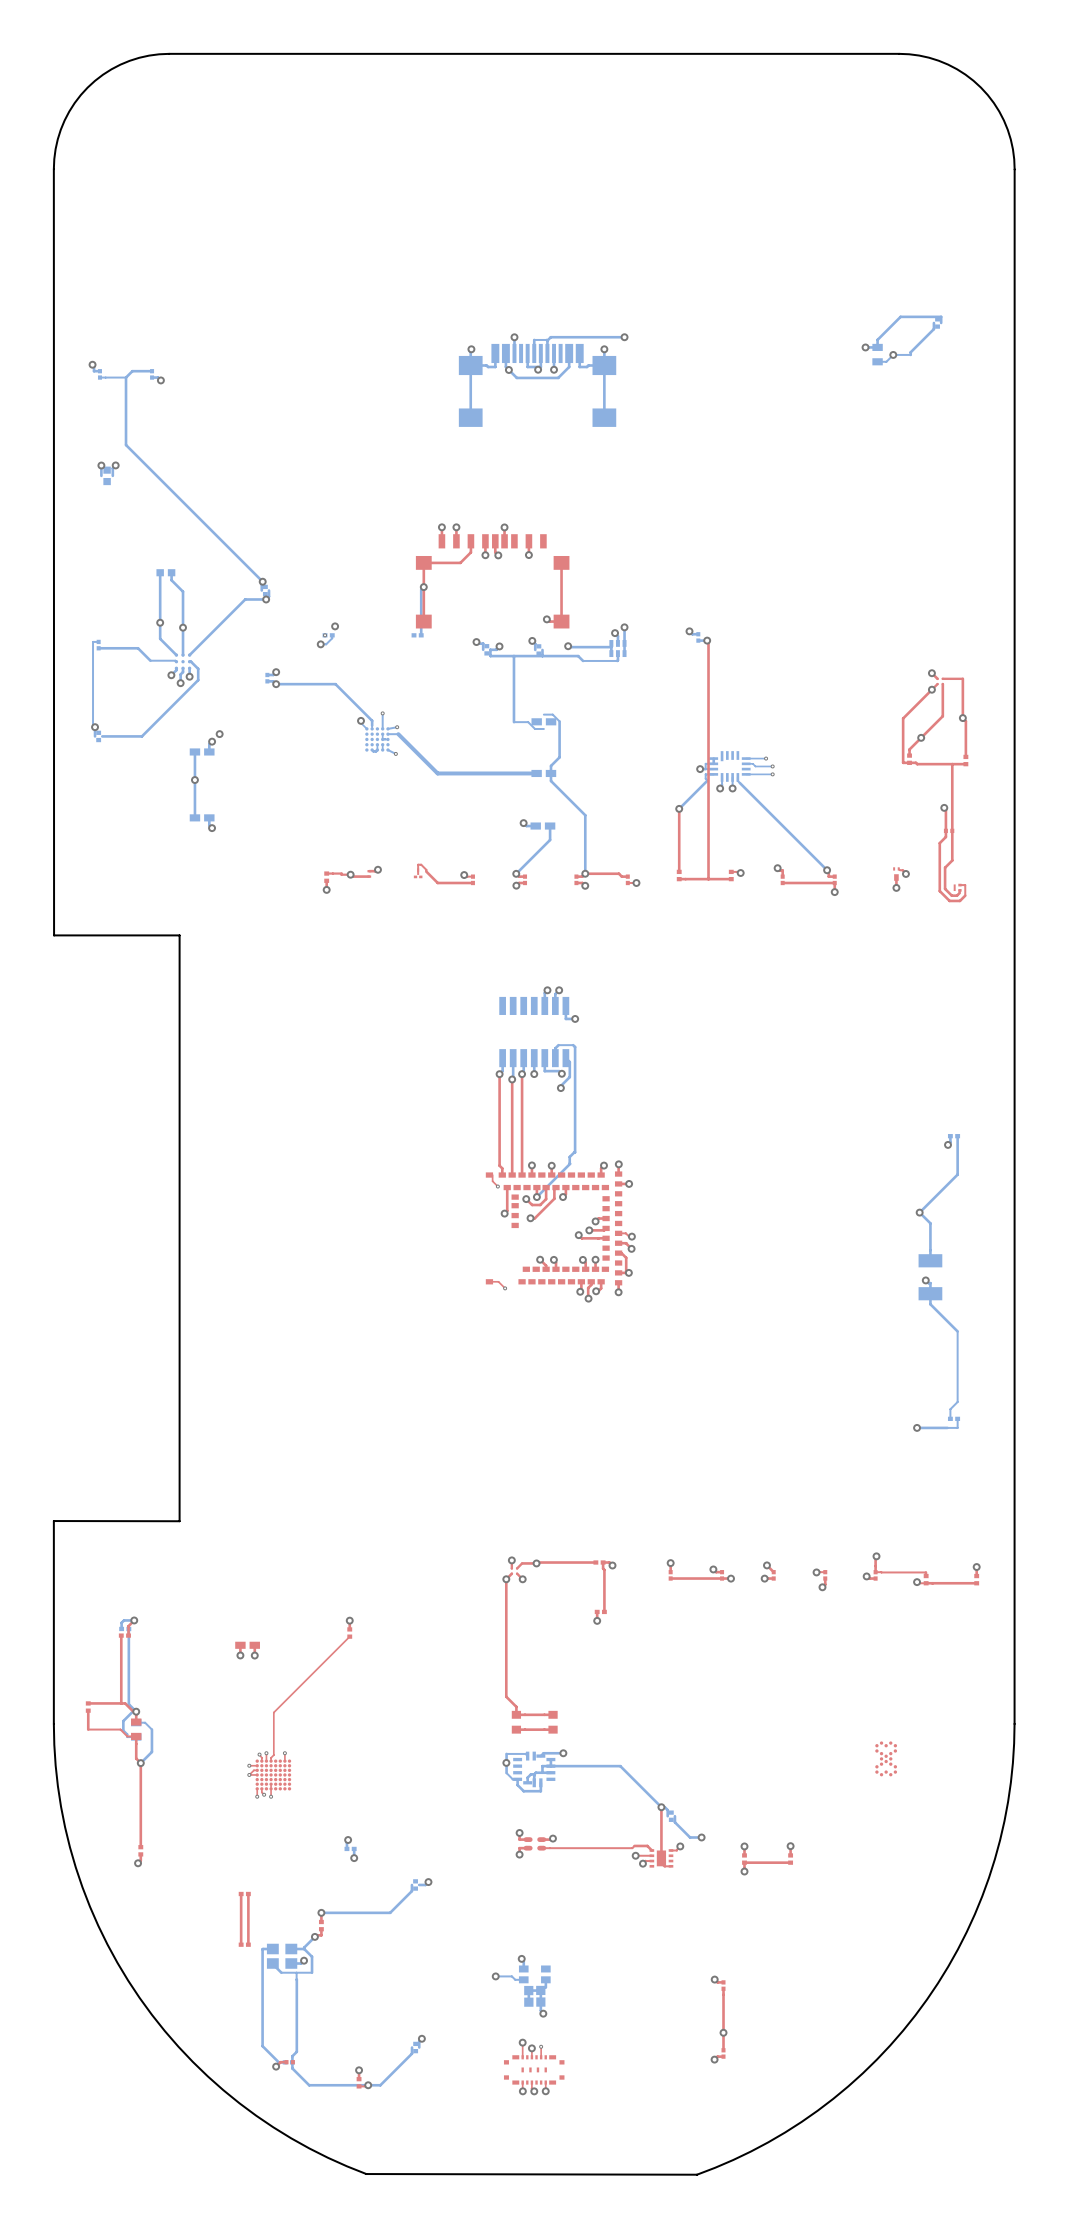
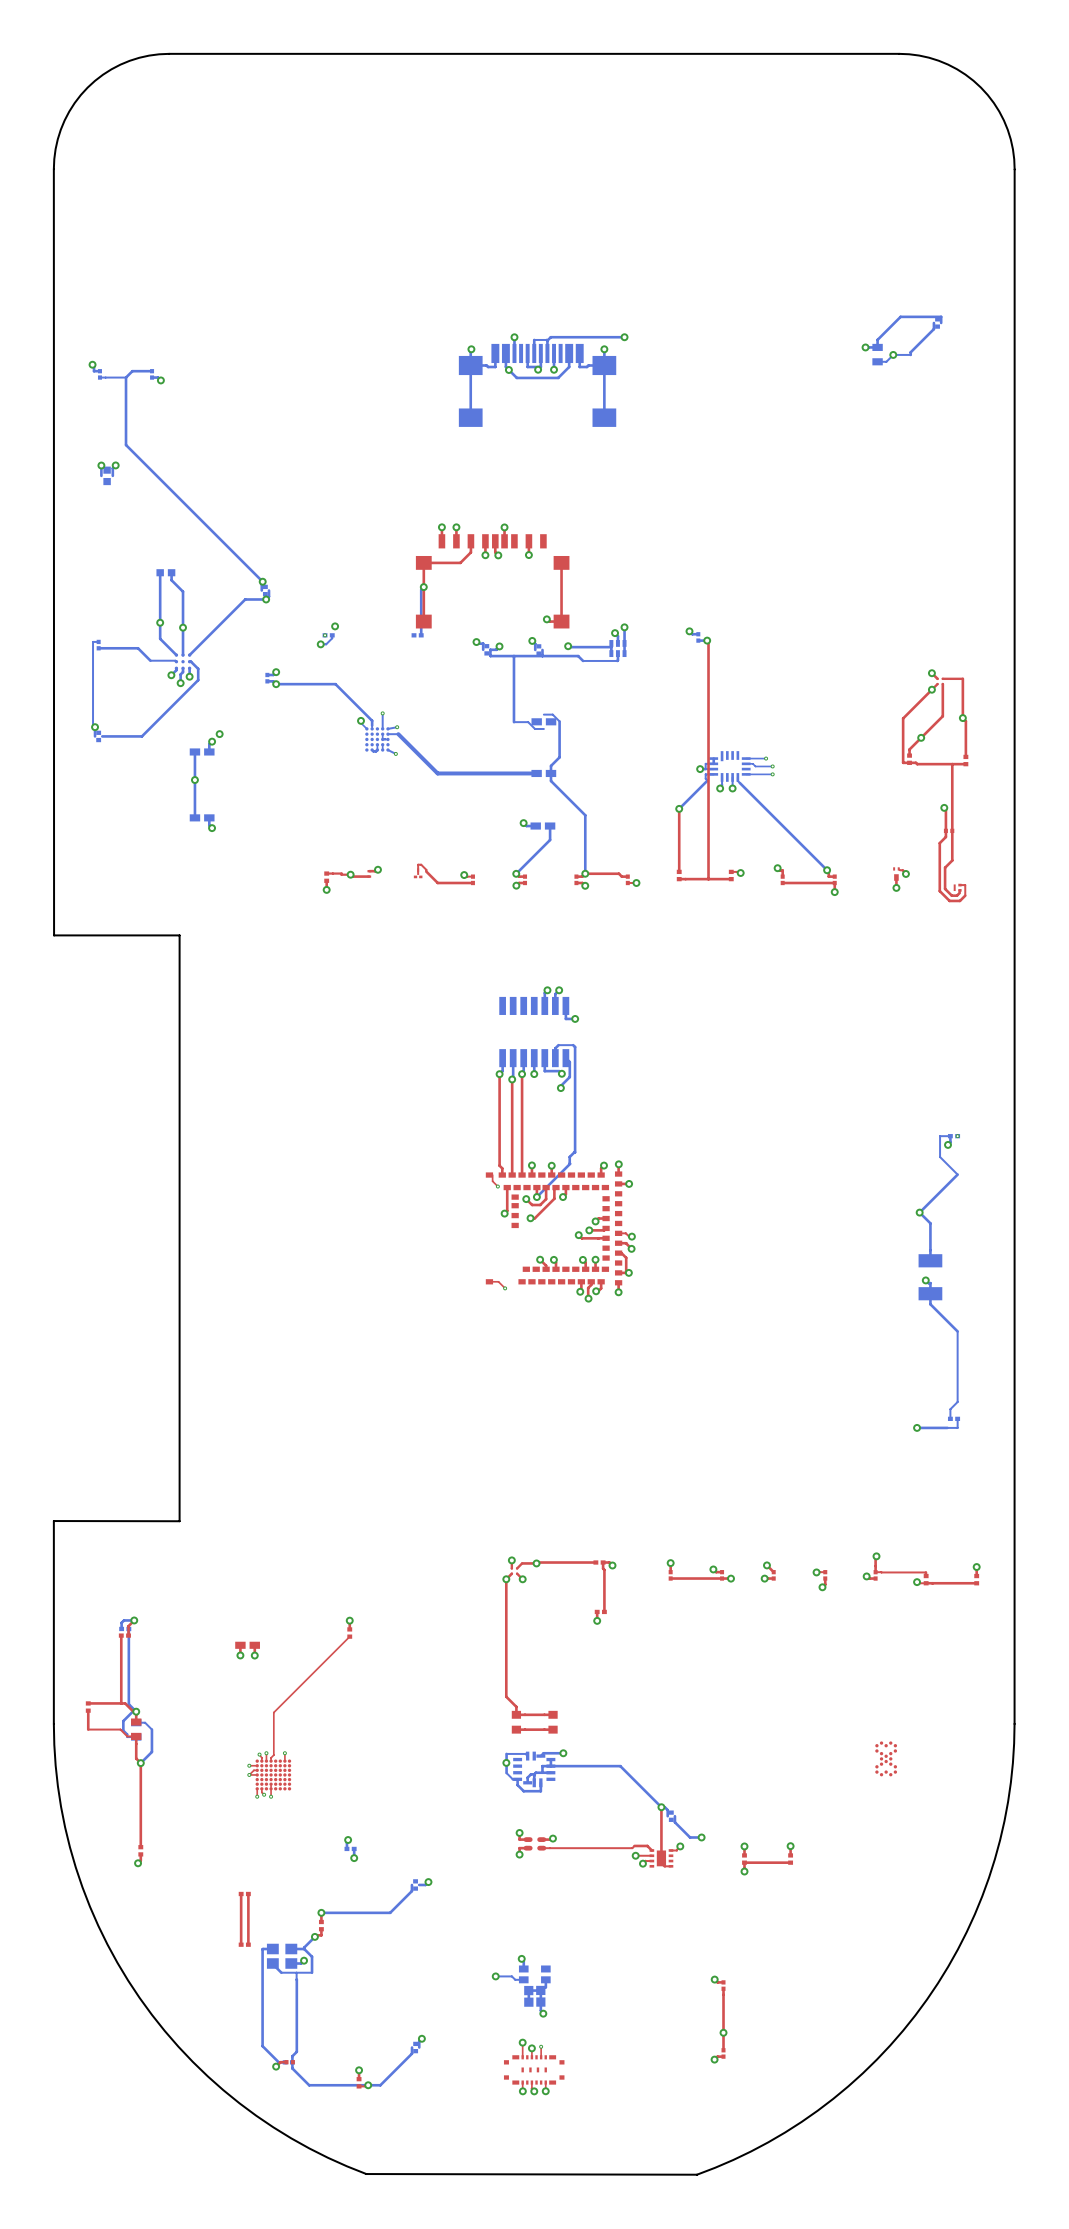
bottom track: (957, 1136) (957, 1174) -> (950, 1136) (940, 1136) (940, 1157) (957, 1174)
via: none -> (957, 1136)

